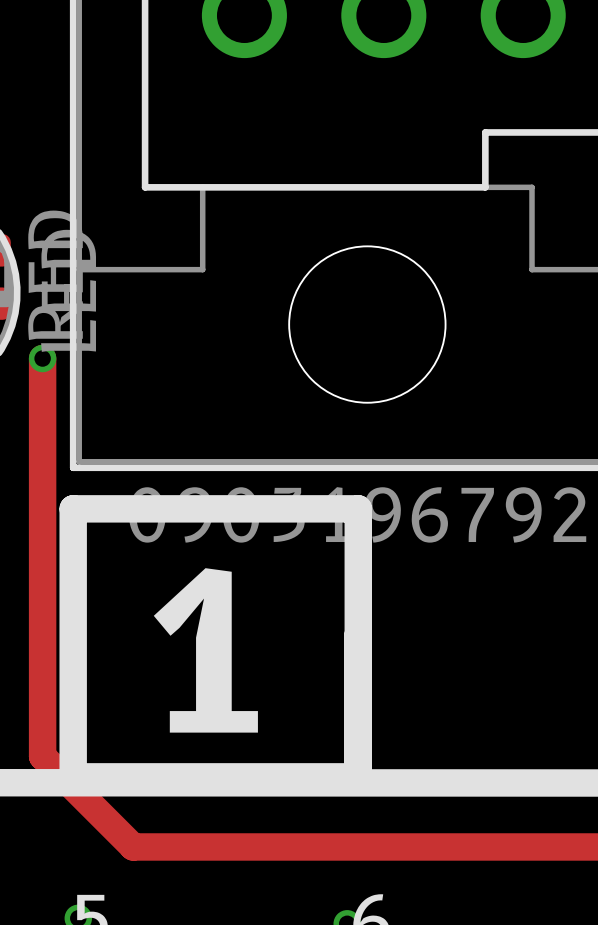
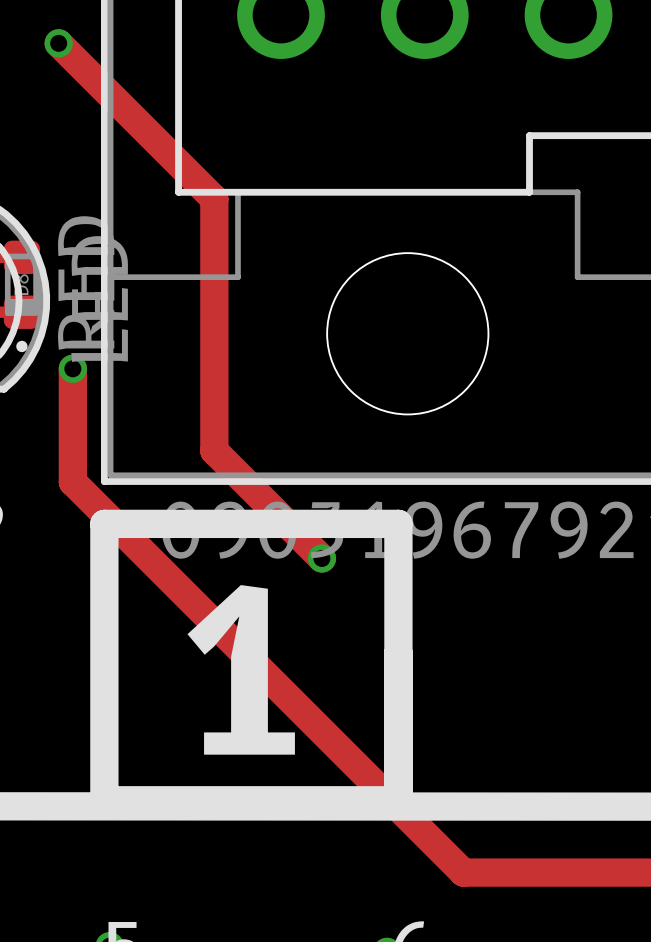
track: none -> (58, 43) (214, 199) (214, 450) (321, 558)
via: none -> (58, 43)
track: (42, 468) (42, 756) (133, 846) (421, 846) -> (72, 482) (463, 872)
via: none -> (321, 558)

